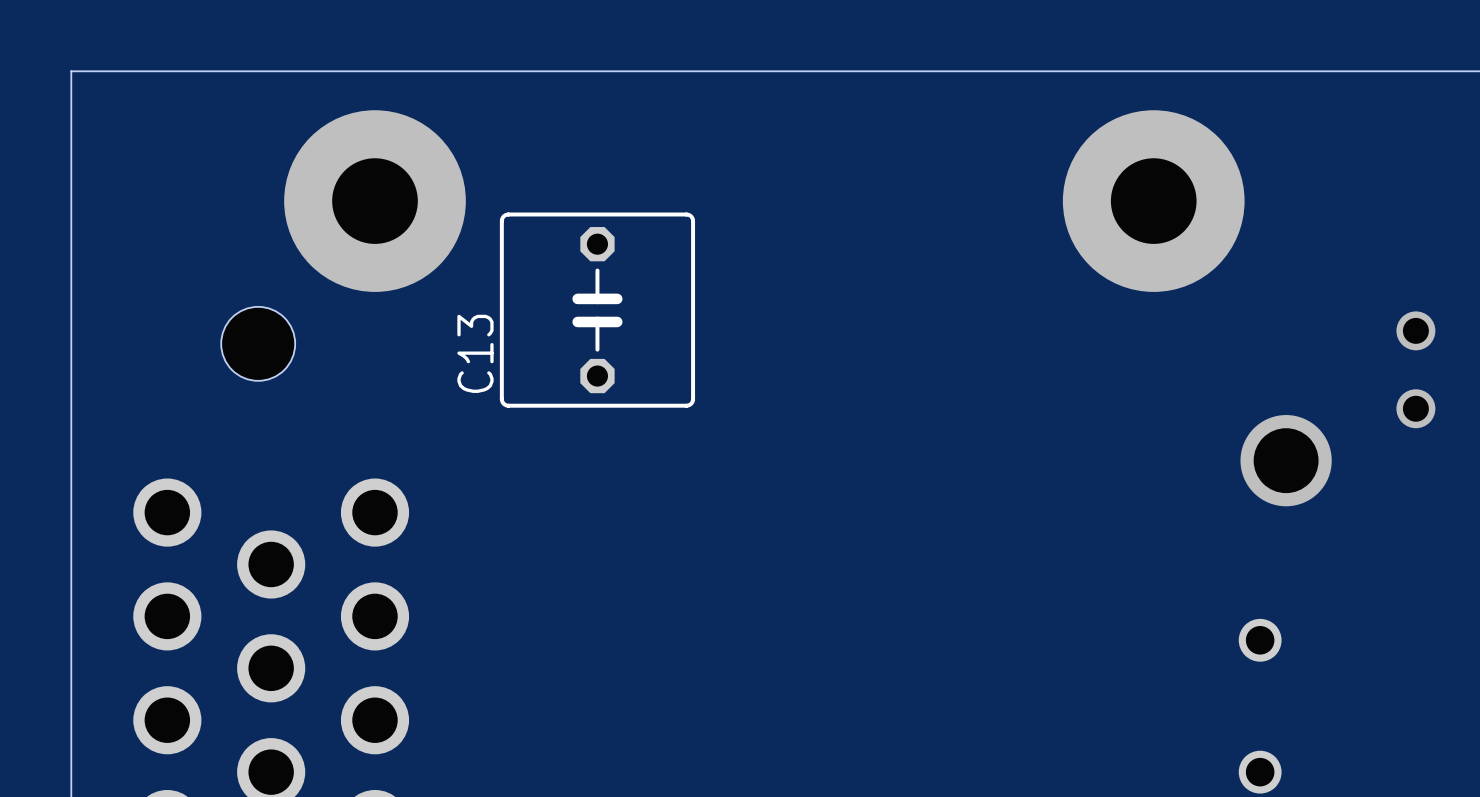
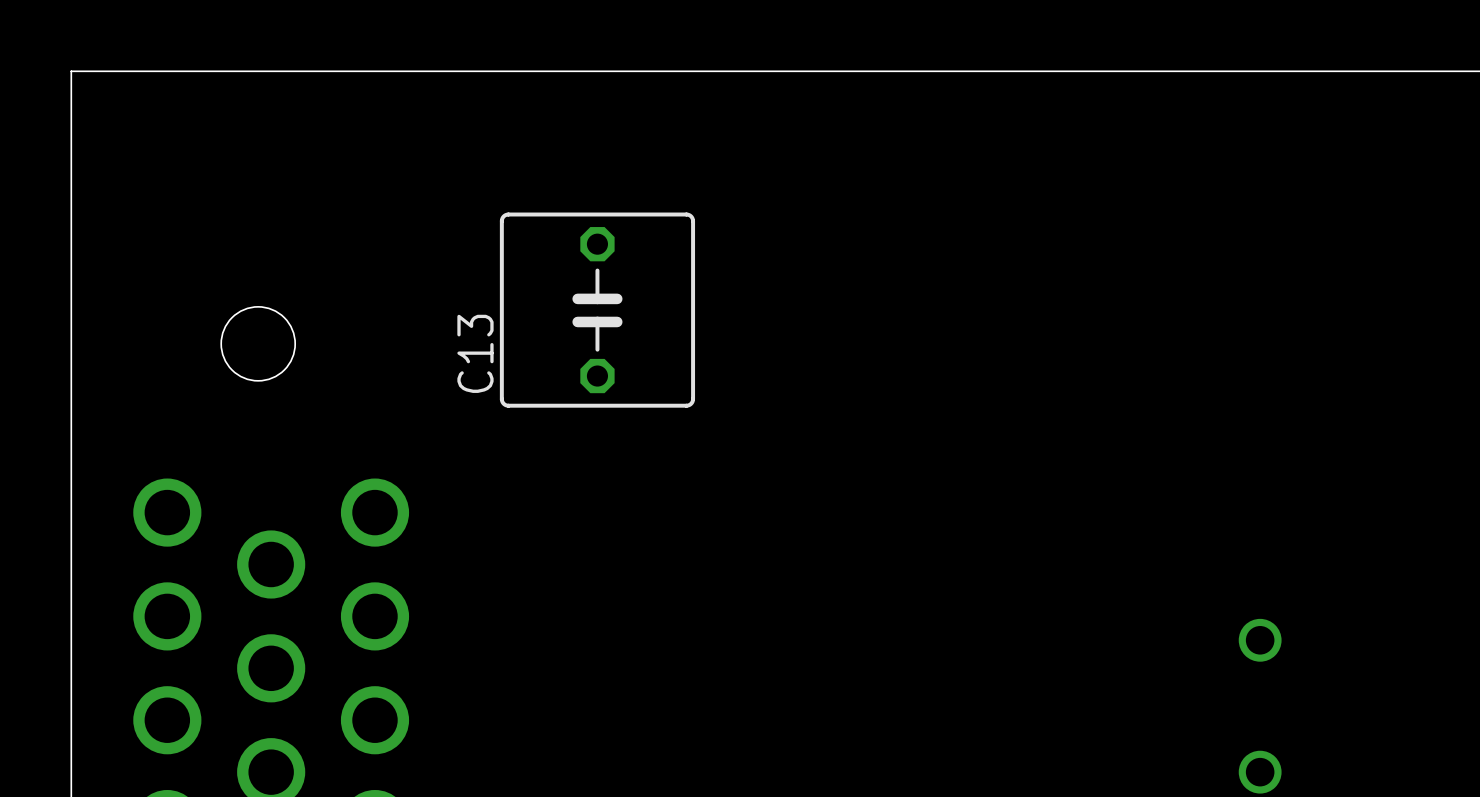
via: (375, 201) -> none
via: (1153, 201) -> none
via: (1415, 330) -> none
via: (1415, 408) -> none
via: (1286, 460) -> none

